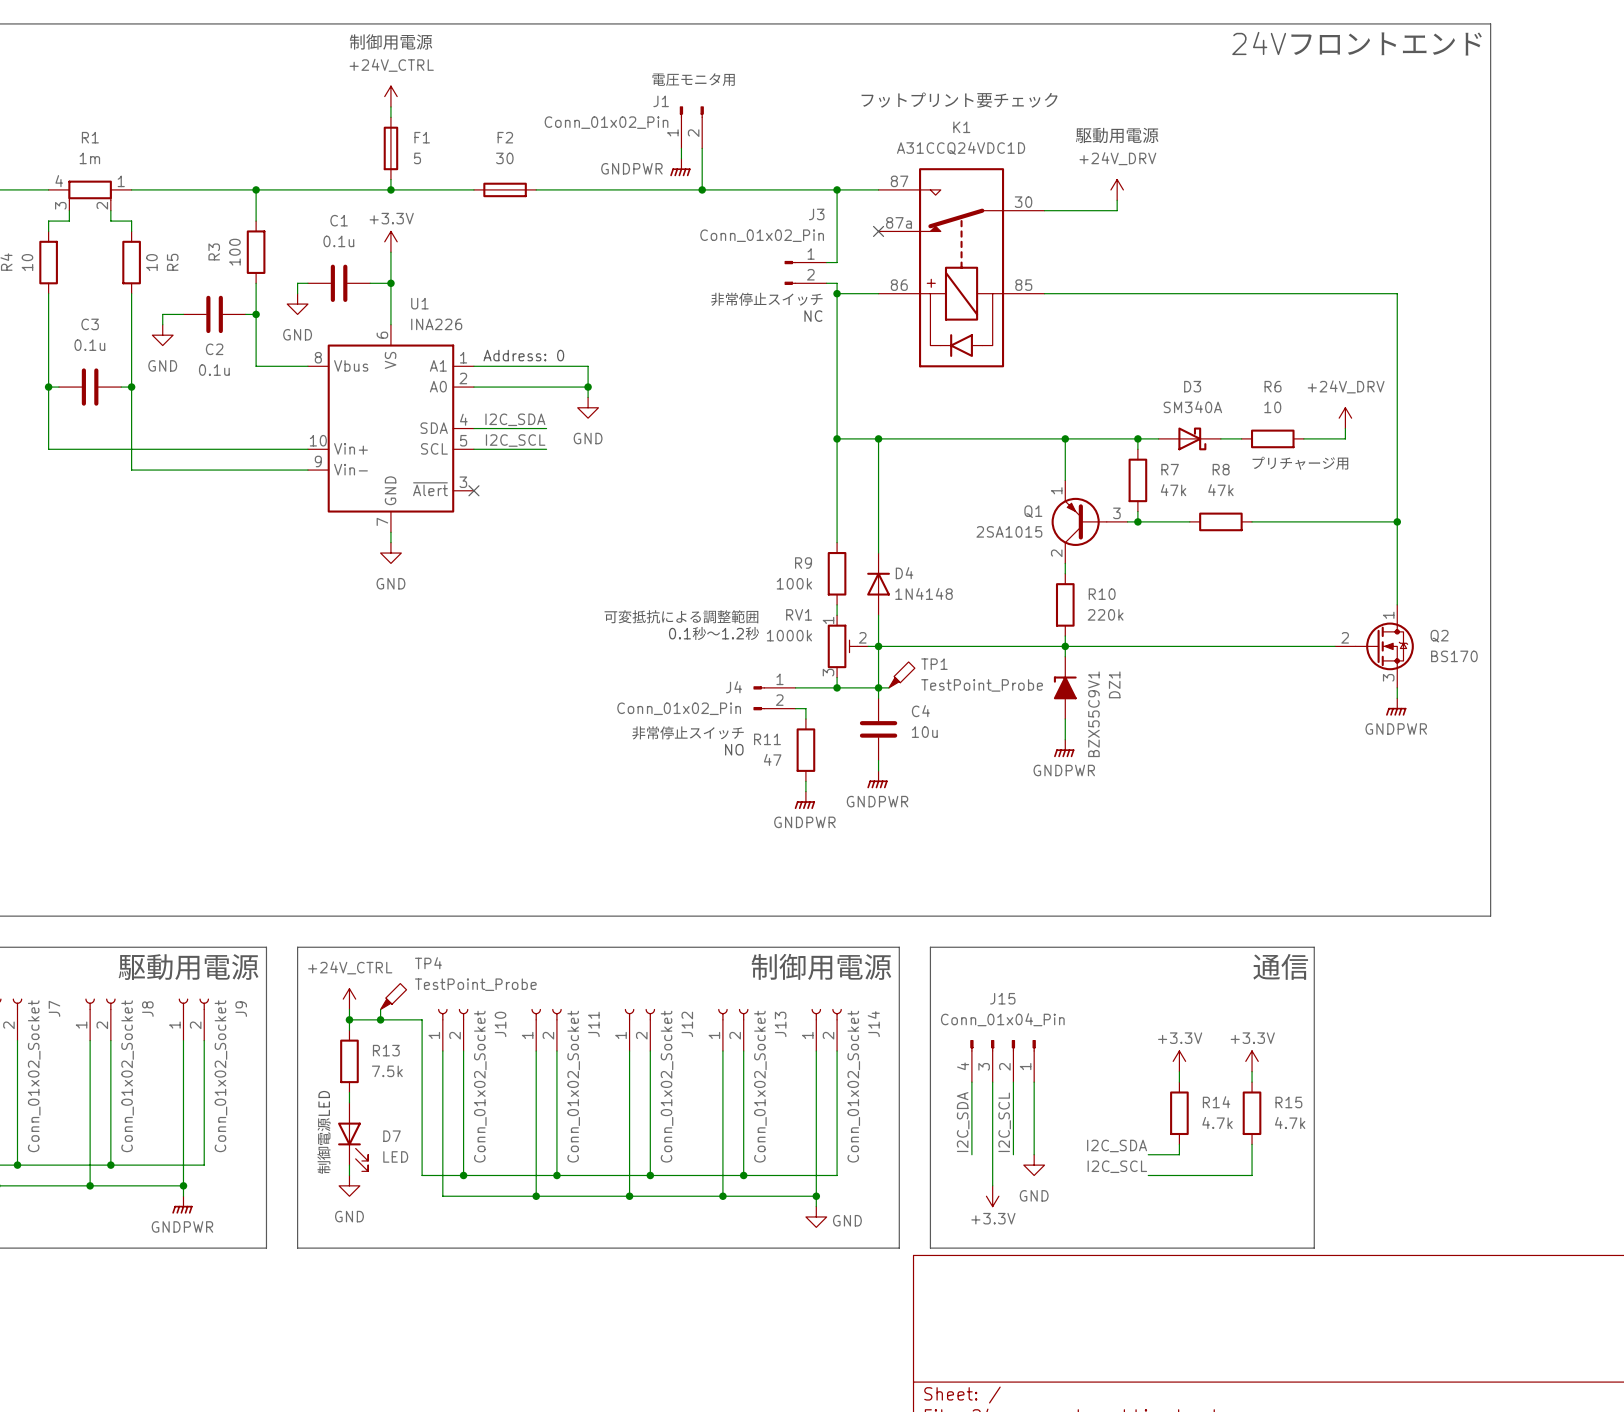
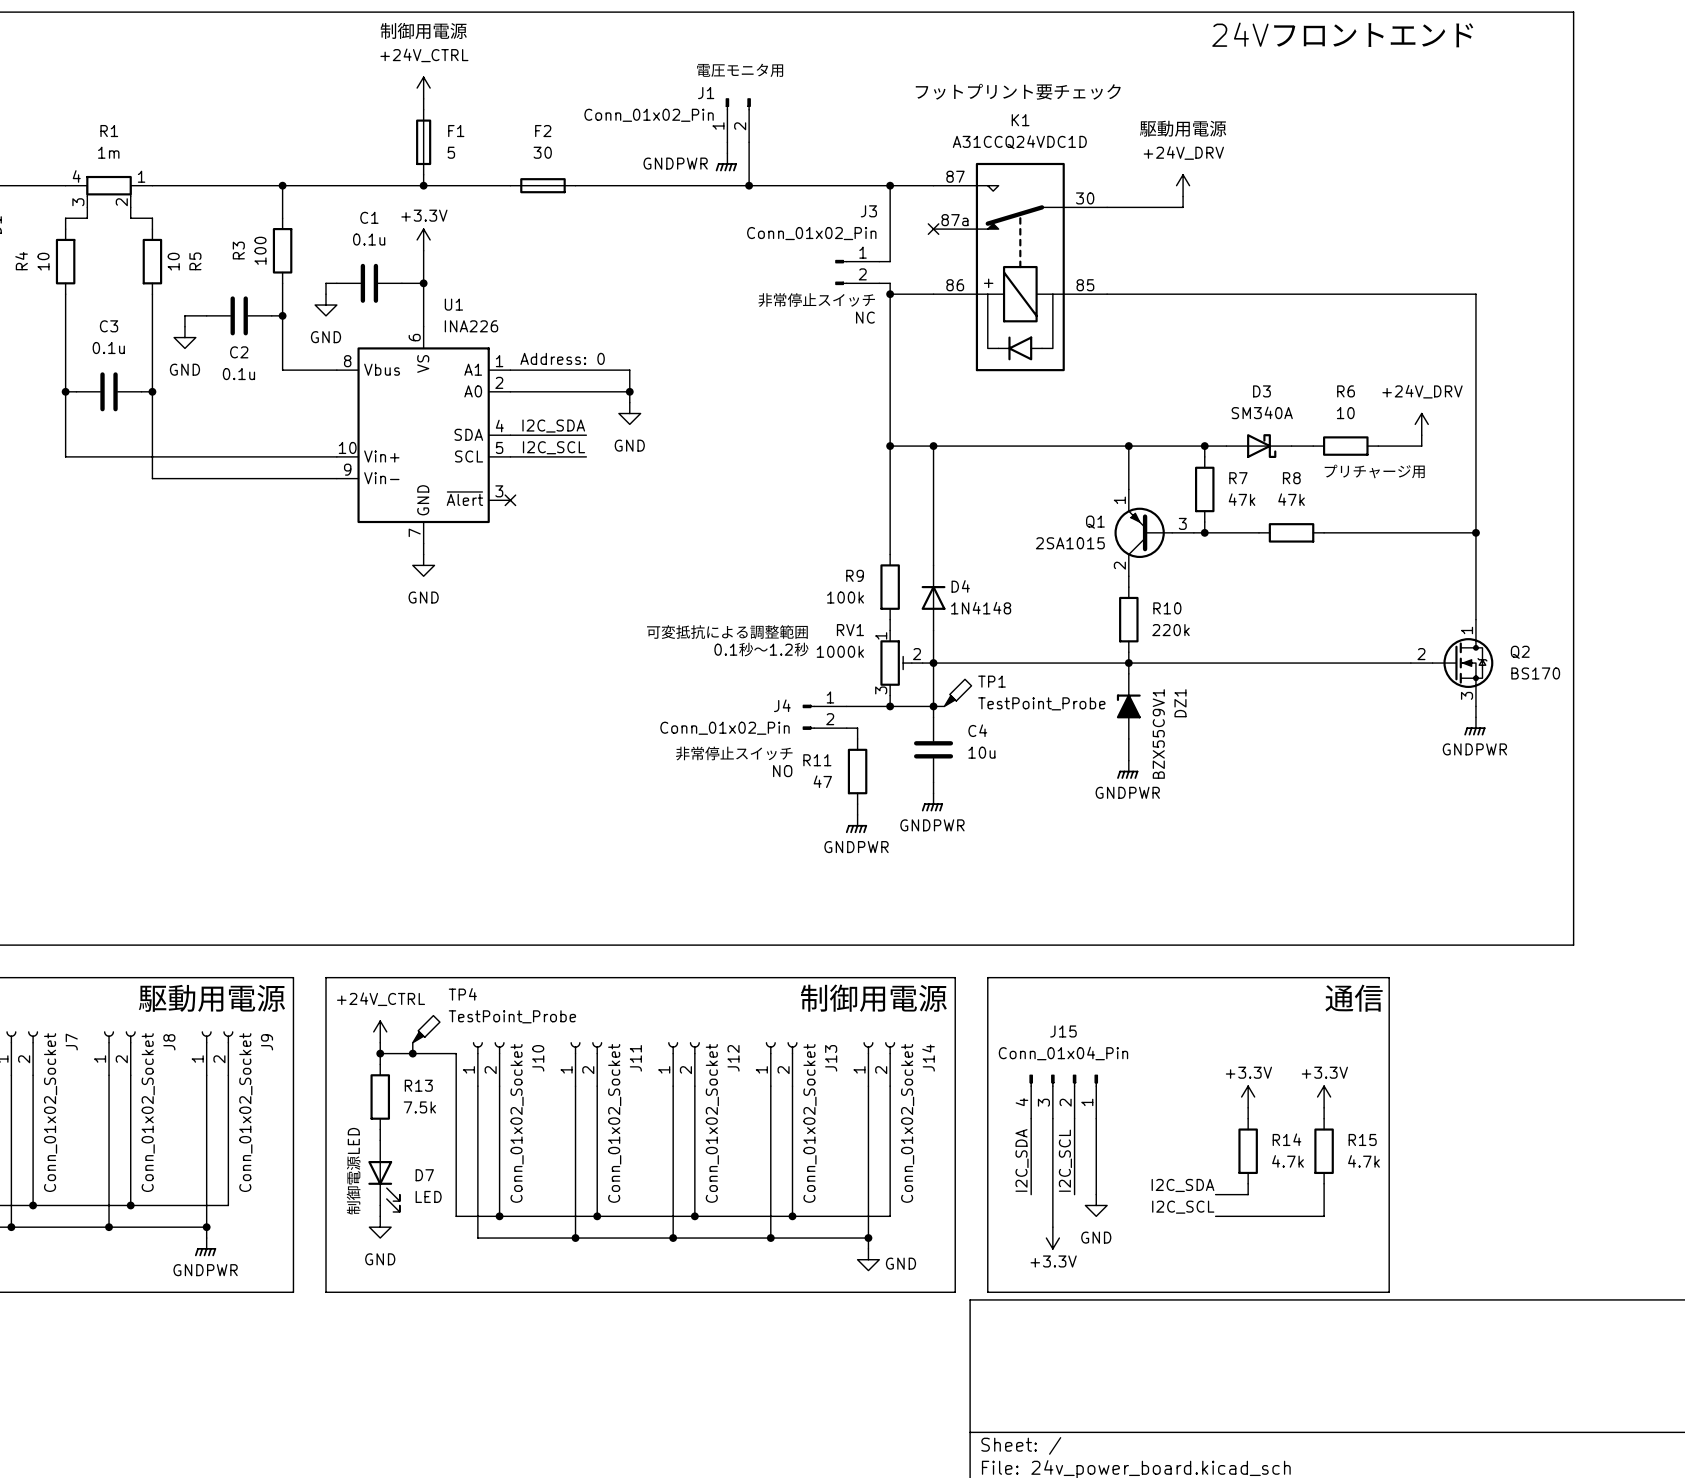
text position: 24Vフロントエンド (1357, 43) -> 24Vフロントエンド (1343, 35)

